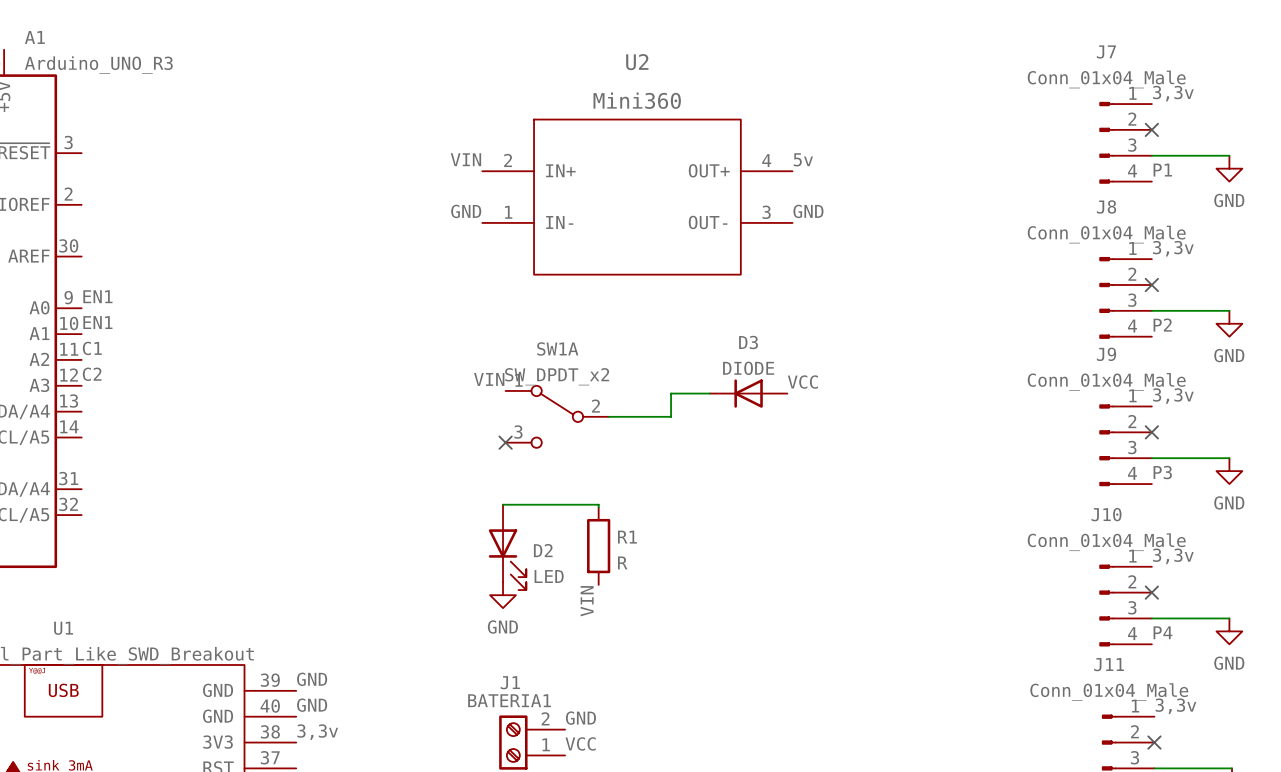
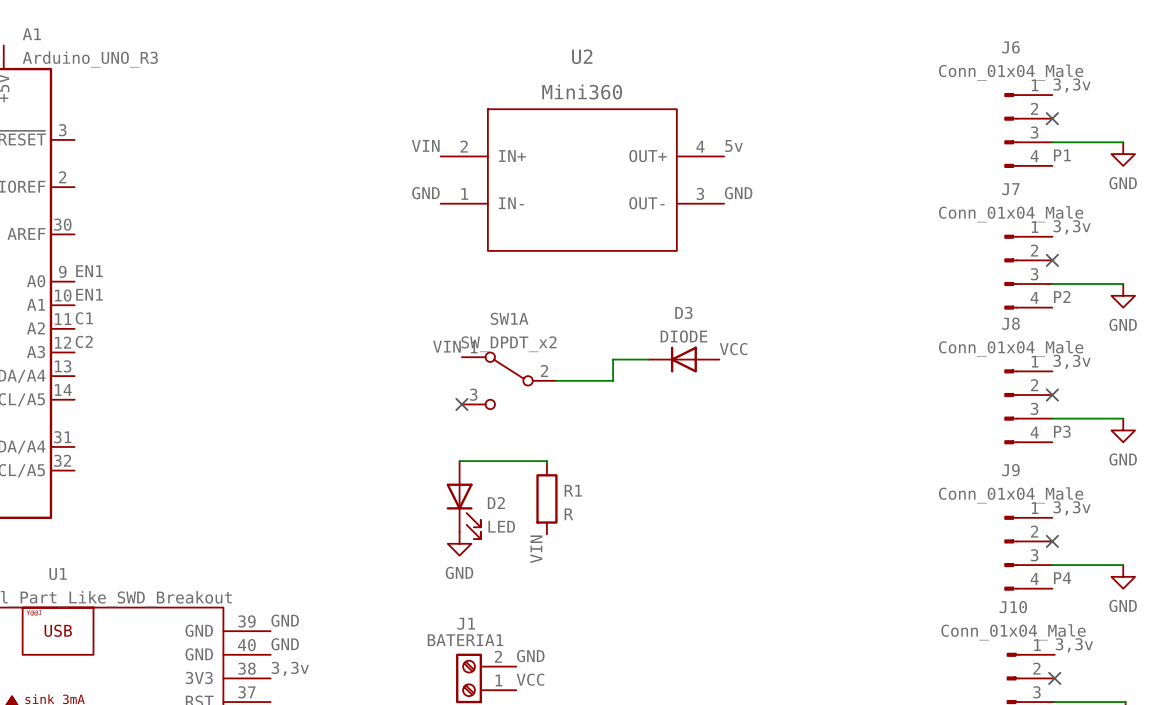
J7 name: J7 (1106, 51) -> J6 (1010, 47)
J8 name: J8 (1106, 206) -> J7 (1010, 189)
J9 name: J9 (1106, 354) -> J8 (1010, 323)
J10 name: J10 (1106, 514) -> J9 (1010, 470)
J11 name: J11 (1109, 664) -> J10 (1013, 607)

